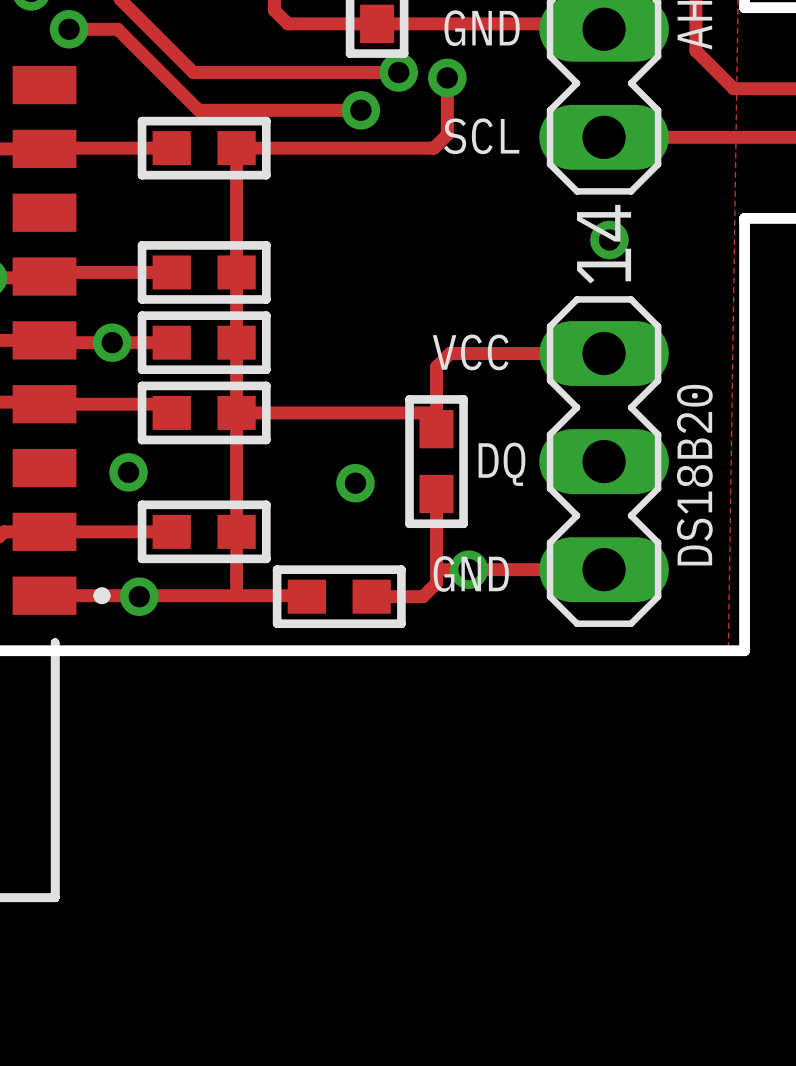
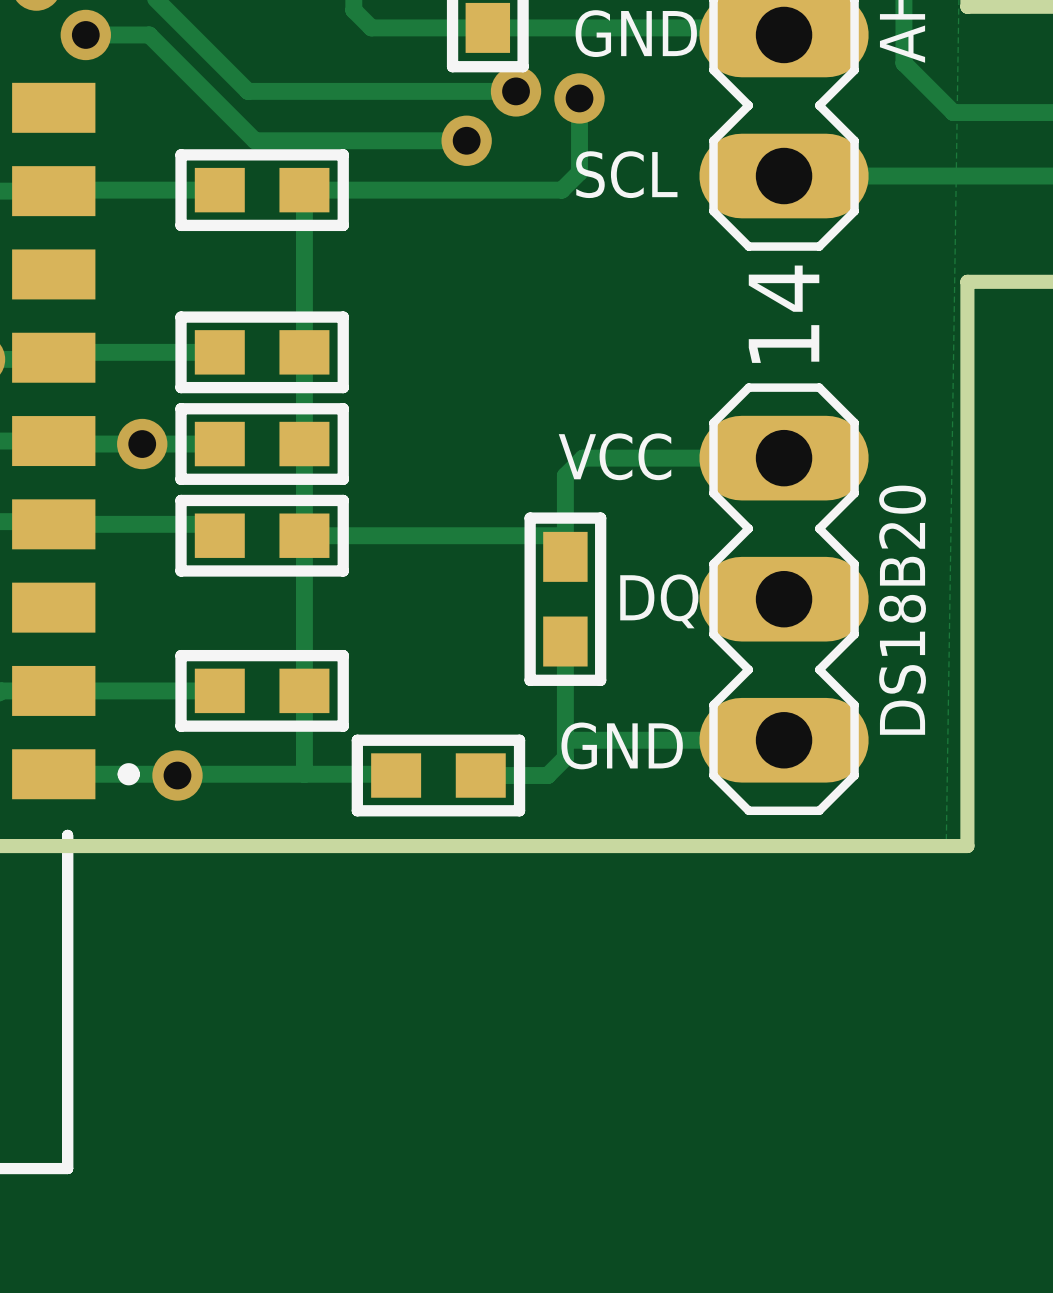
via: (609, 240) -> none
via: (128, 472) -> none
via: (355, 483) -> none
via: (468, 569) -> none

